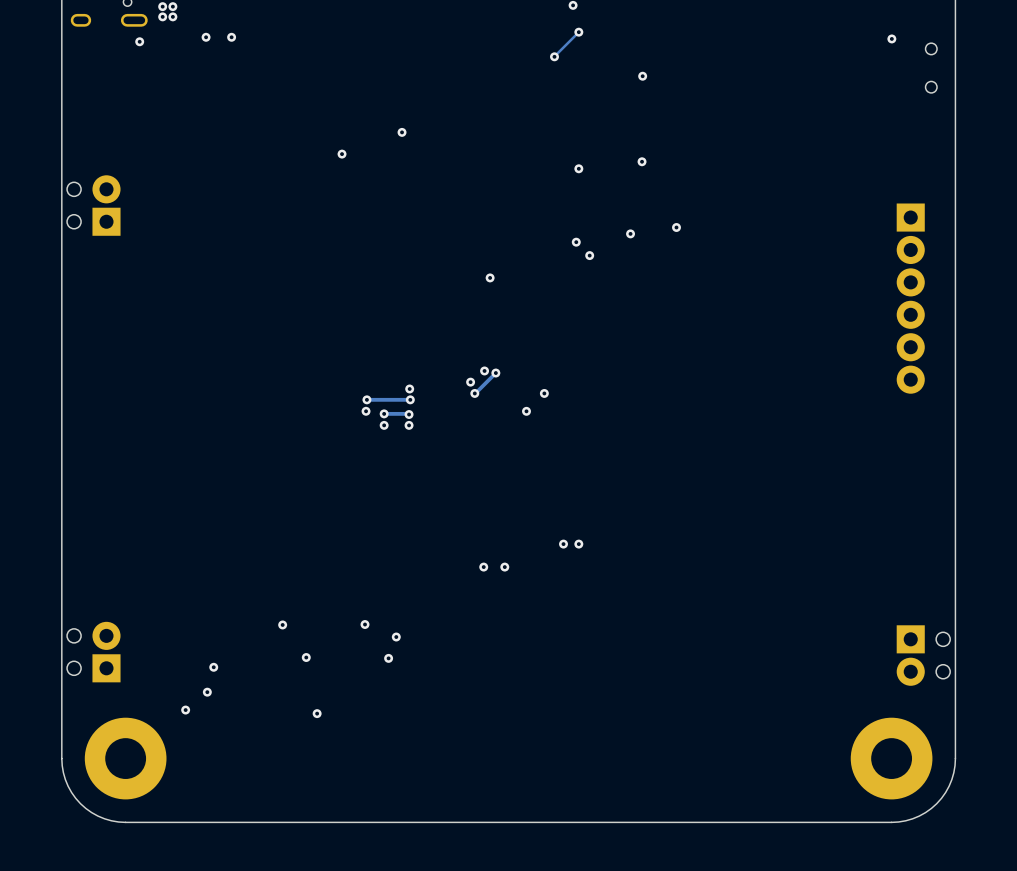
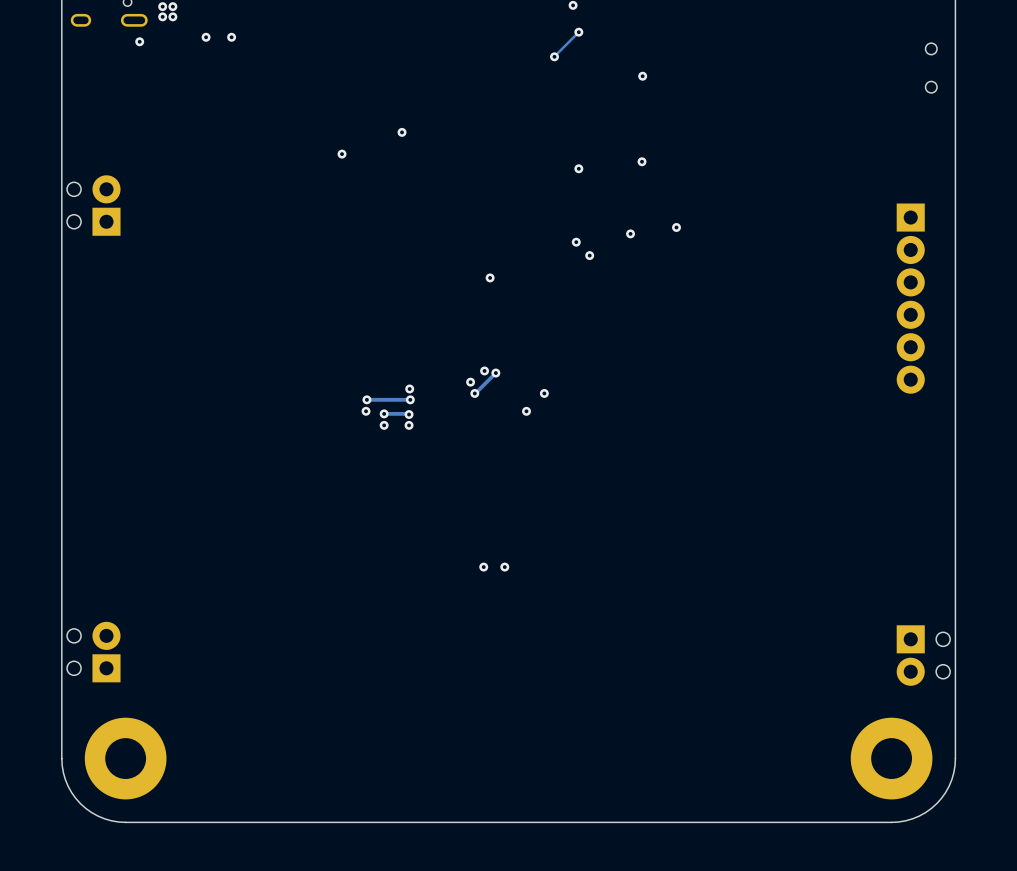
via: (891, 38) -> none
via: (563, 544) -> none
via: (578, 544) -> none
via: (282, 624) -> none
via: (365, 624) -> none
via: (396, 637) -> none
via: (306, 657) -> none
via: (388, 658) -> none
via: (213, 667) -> none
via: (207, 692) -> none
via: (185, 710) -> none
via: (317, 713) -> none

